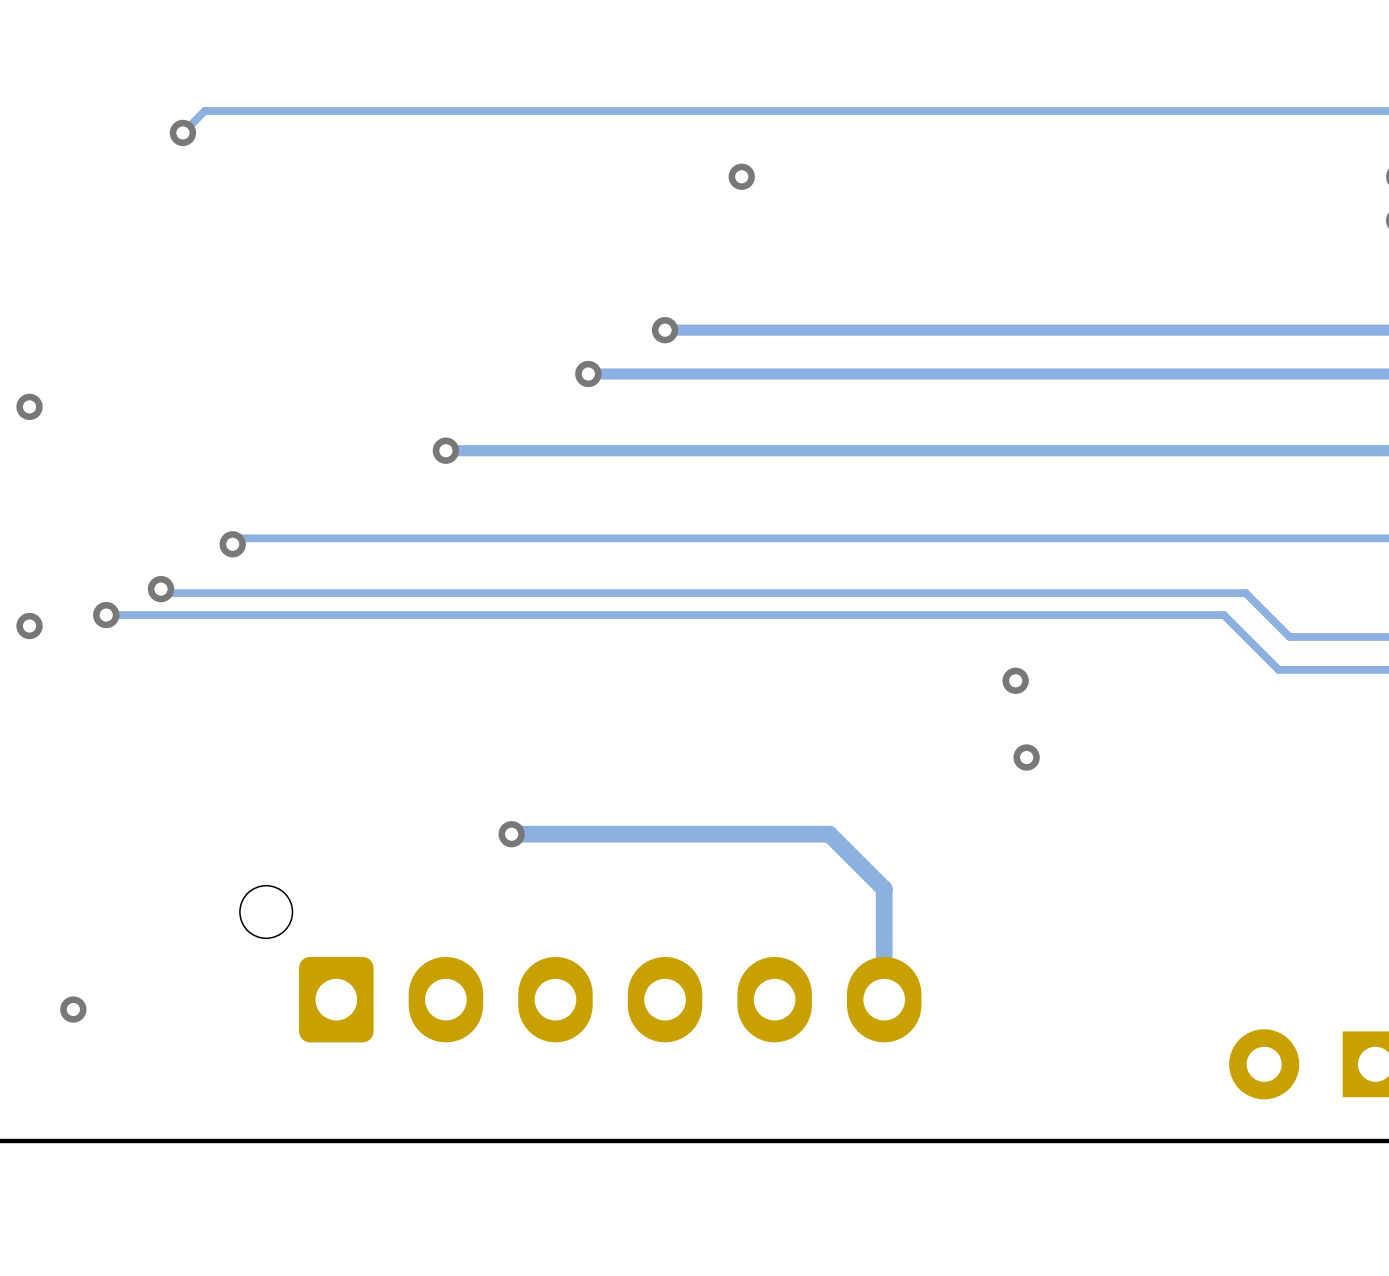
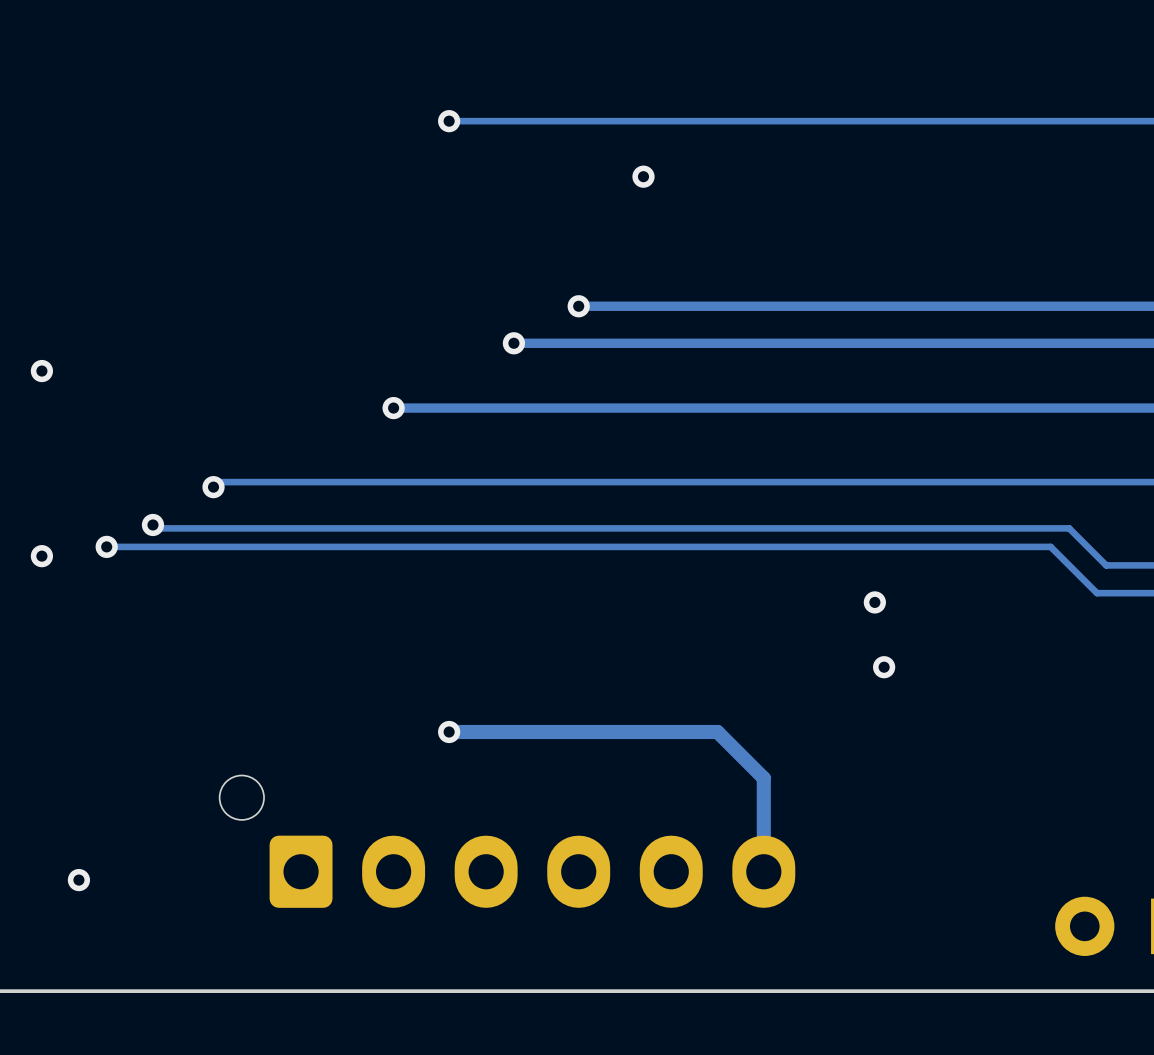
track: (511, 111) (204, 111) (182, 132) -> none
via: none -> (449, 121)
via: (182, 132) -> none

